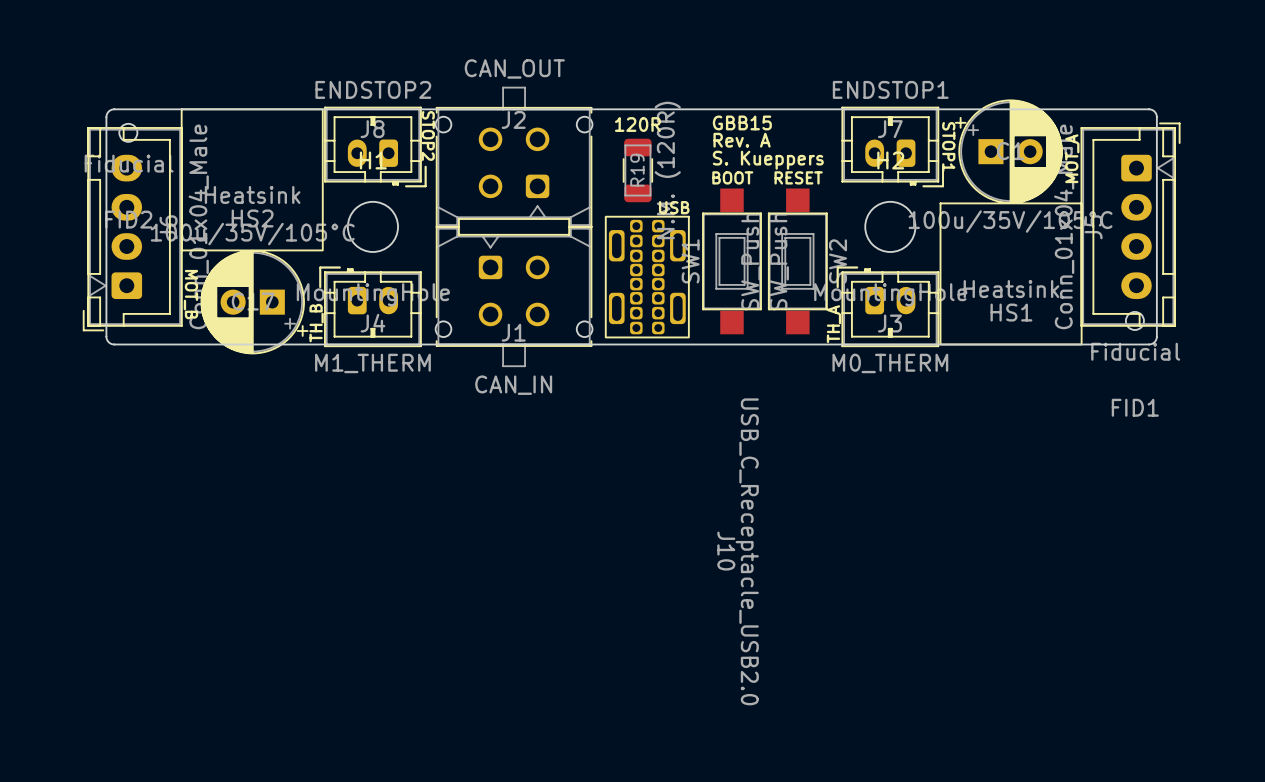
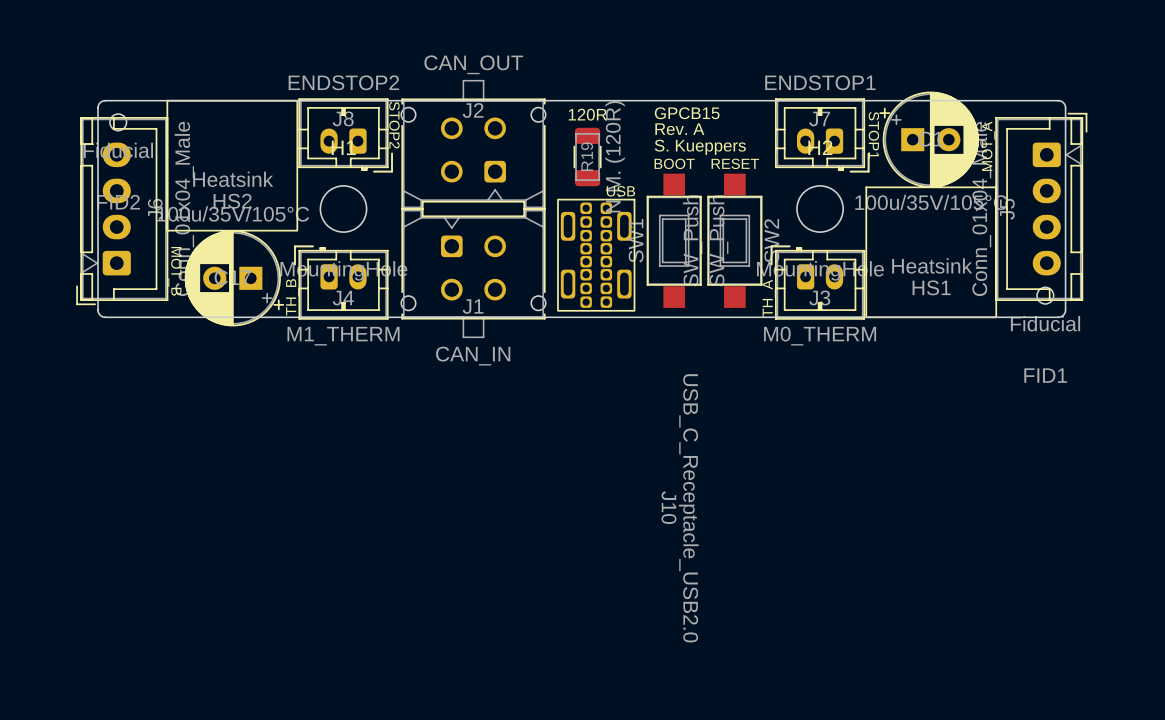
text: GBB15 (742, 122) -> GPCB15 (687, 113)

